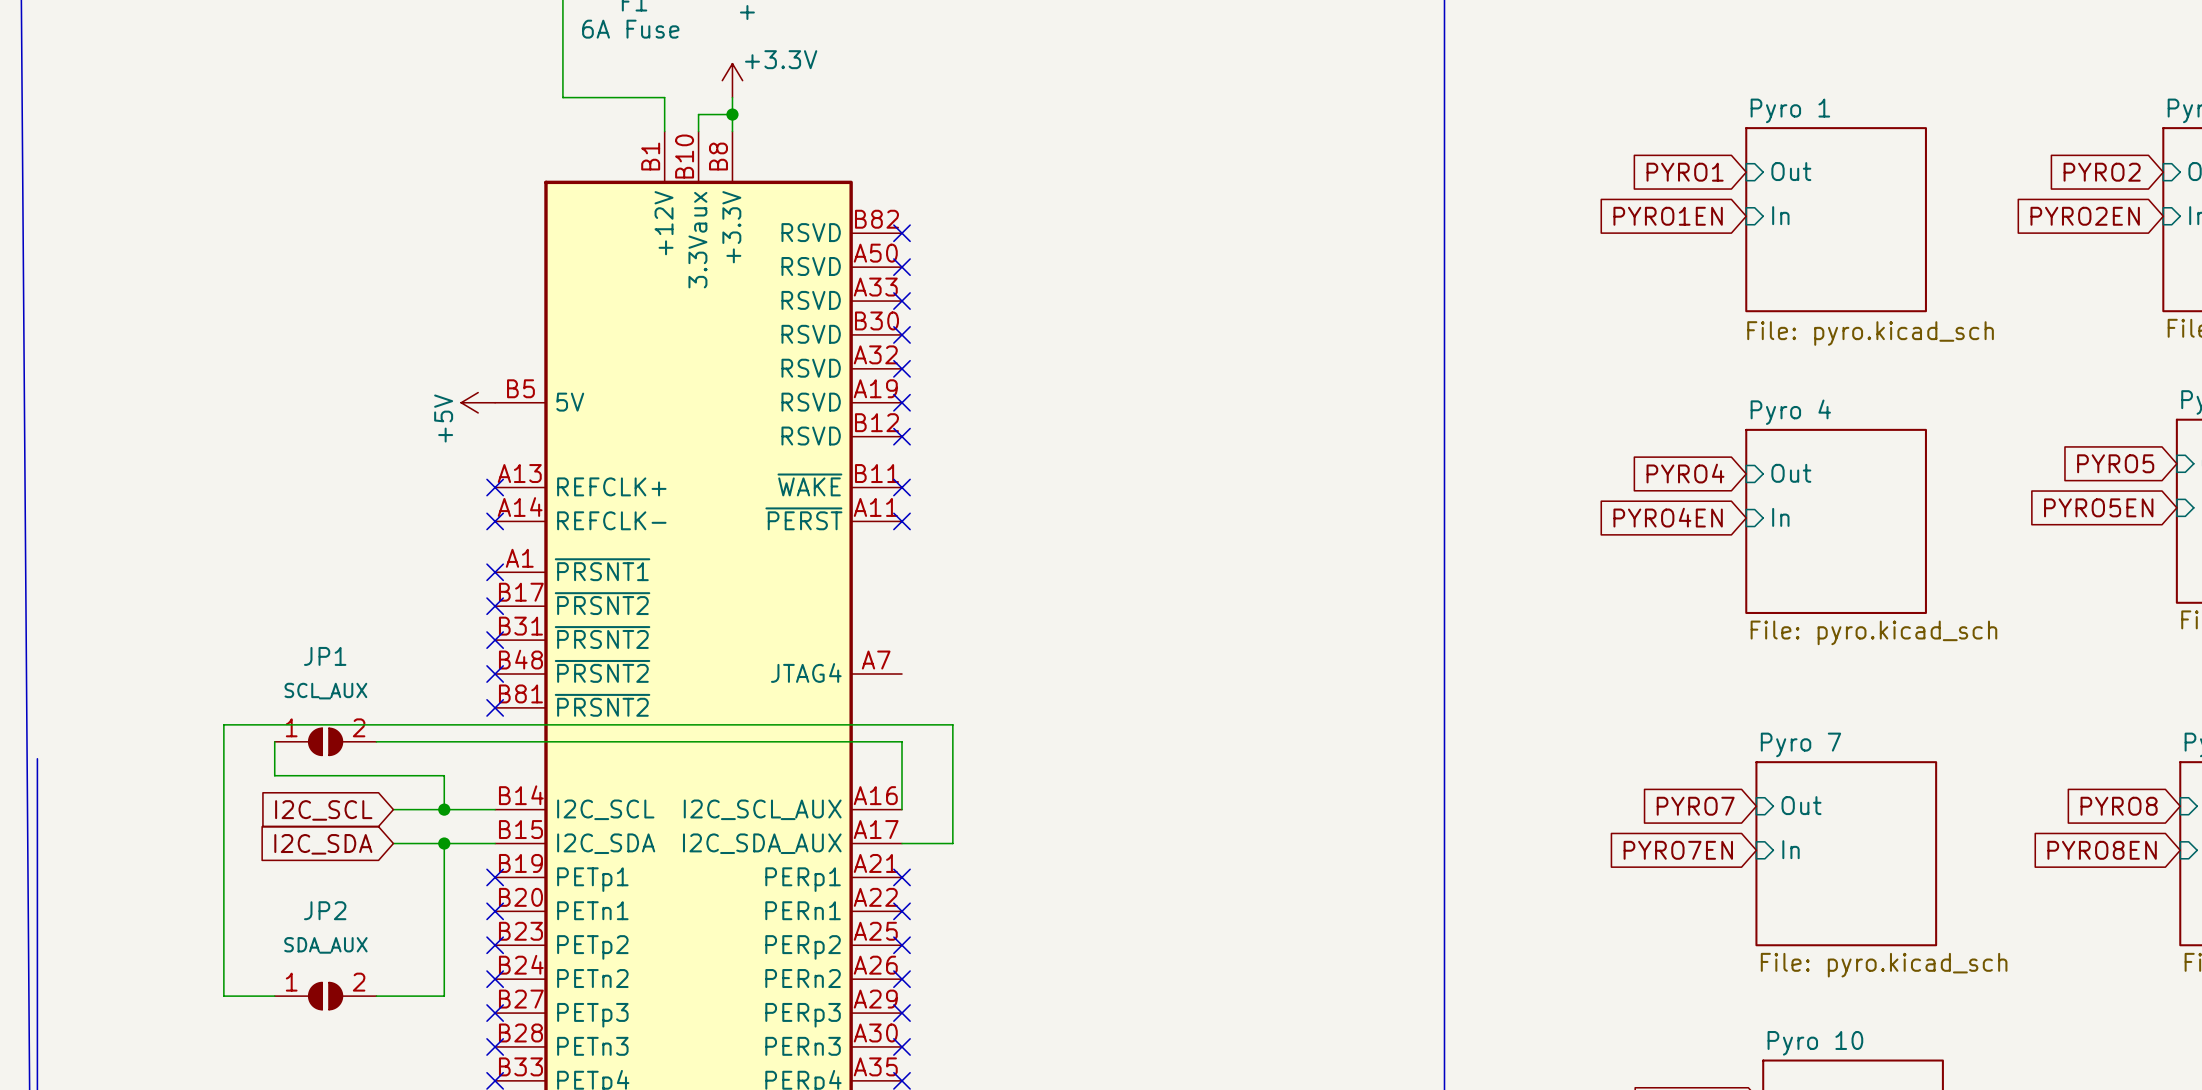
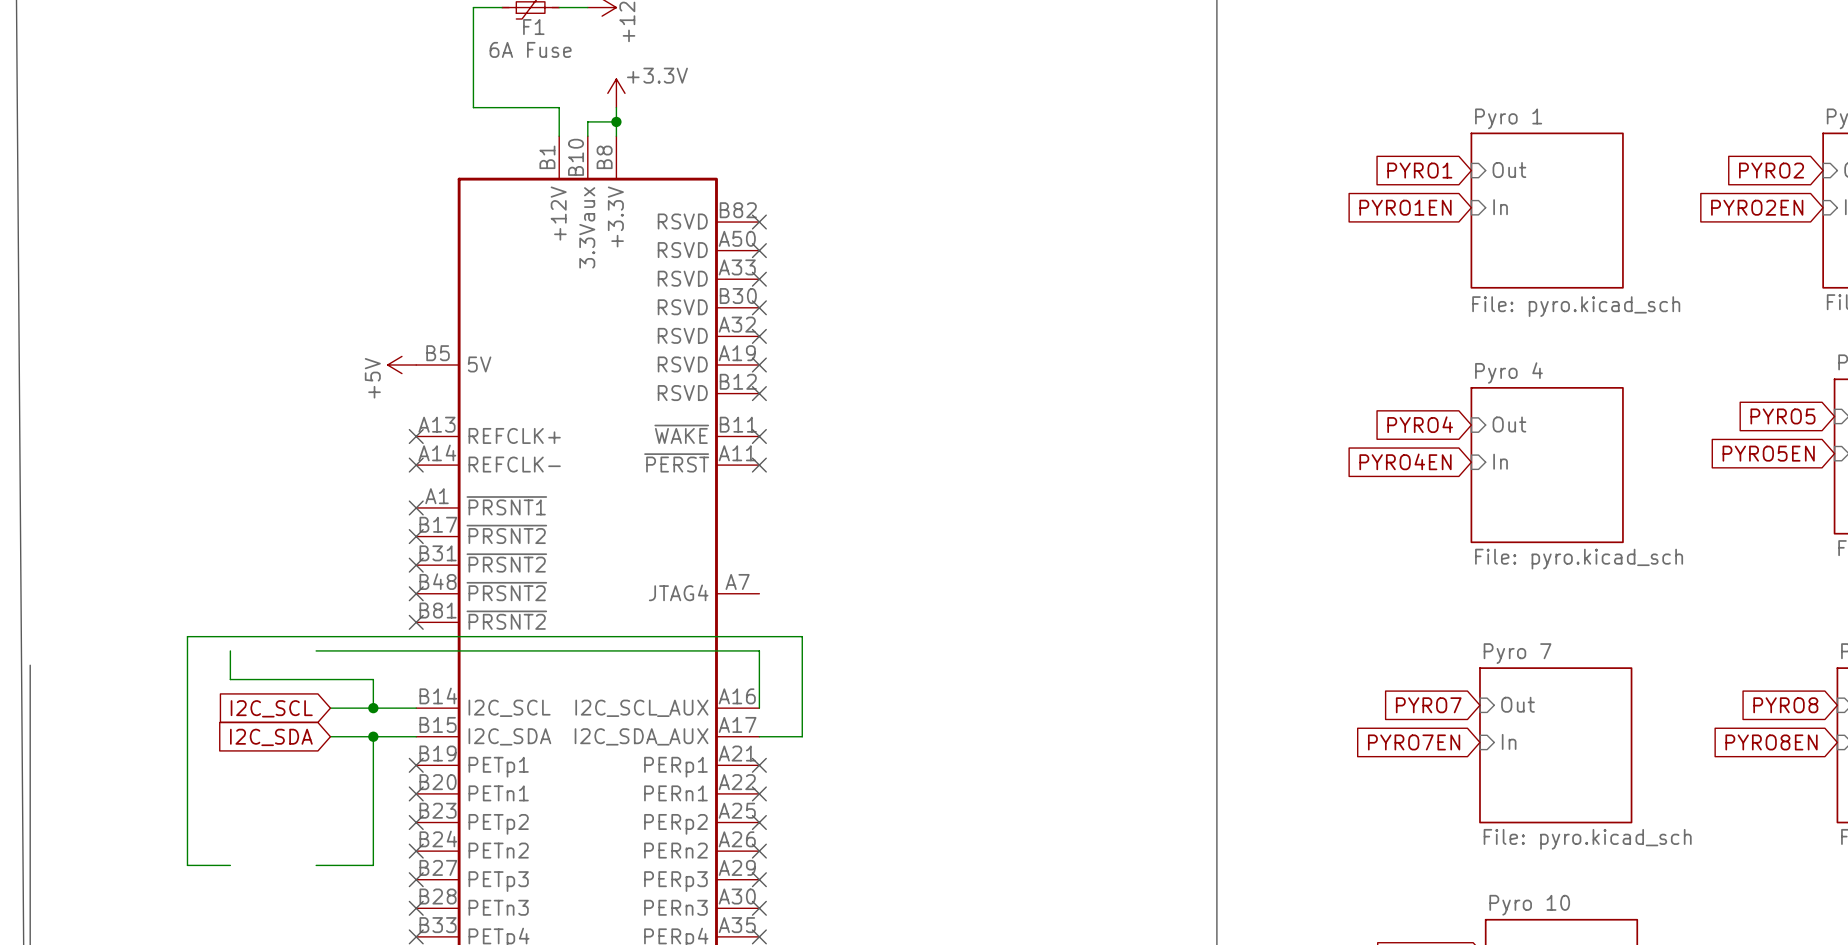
JP1: SCL_AUX (325, 741) -> none
JP2: SDA_AUX (325, 996) -> none

